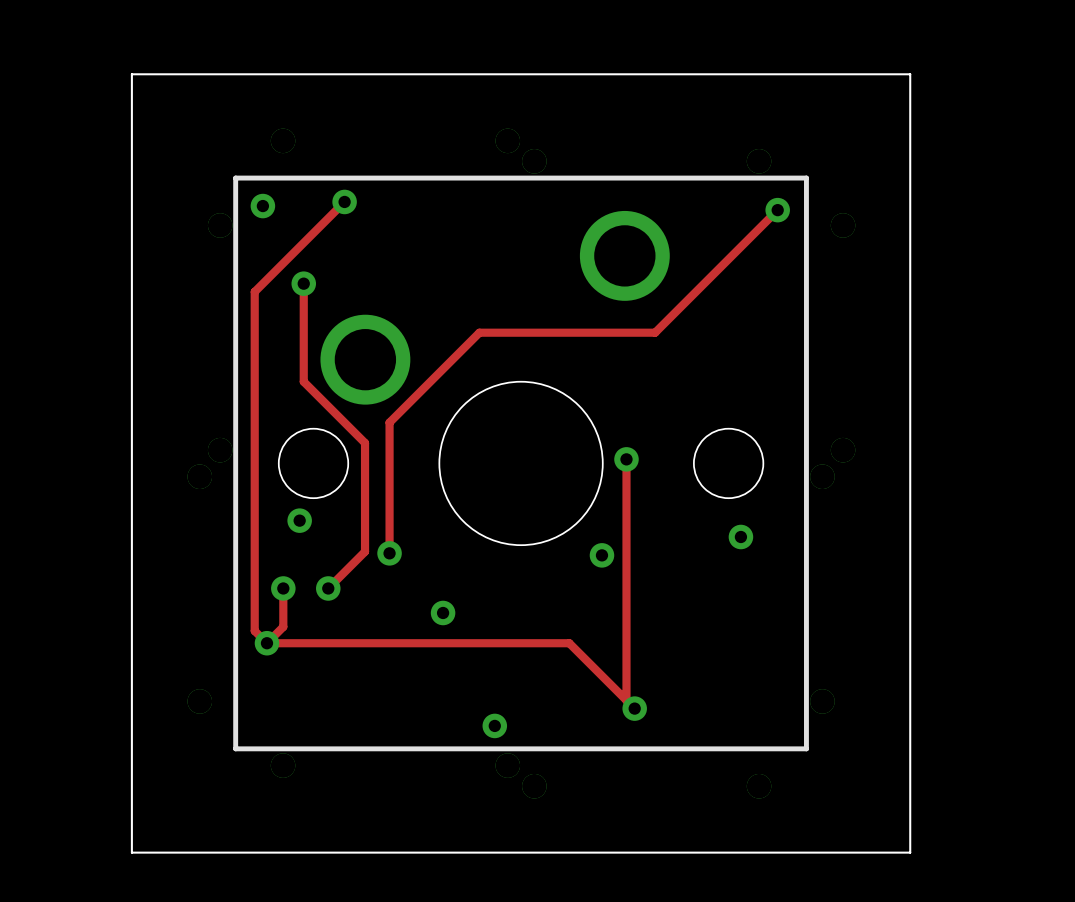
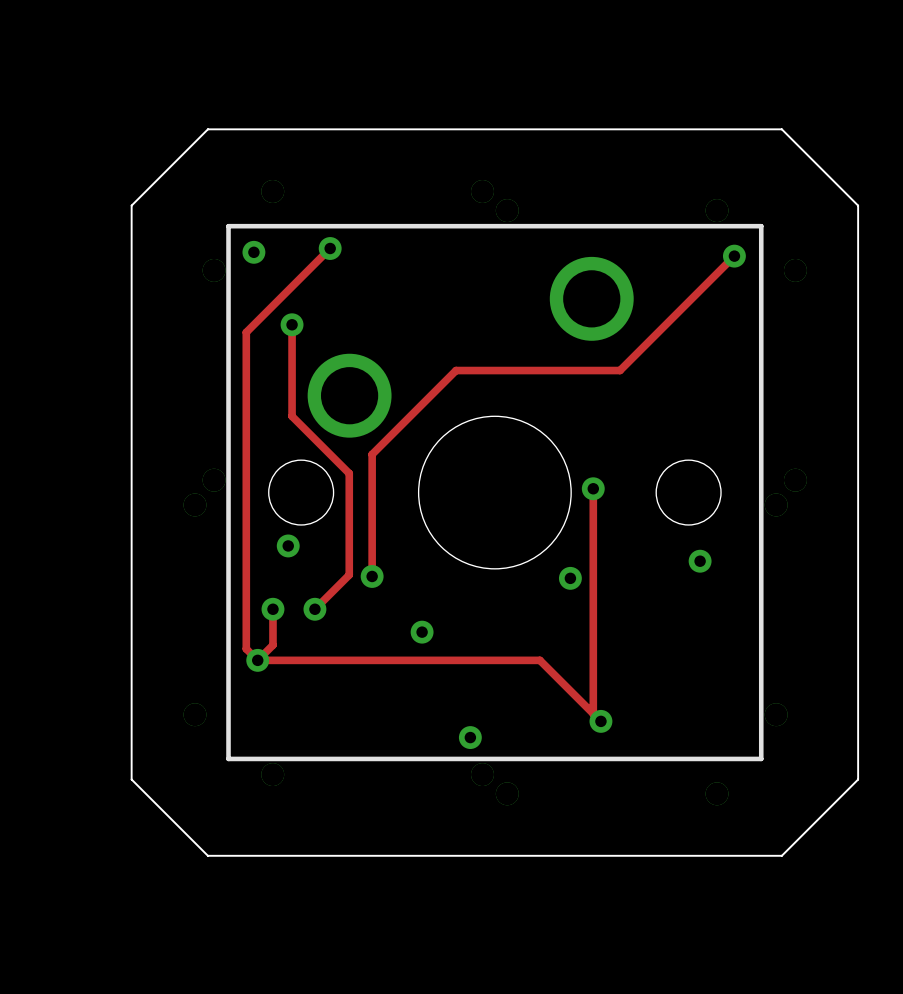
board edge: (213, 74) (131, 74) (131, 156) -> (207, 129) (131, 205)
board edge: (828, 74) (910, 74) (910, 156) -> (781, 129) (858, 205)
board edge: (131, 770) (131, 852) (213, 852) -> (131, 779) (207, 855)
board edge: (910, 770) (910, 852) (828, 852) -> (858, 779) (781, 855)

